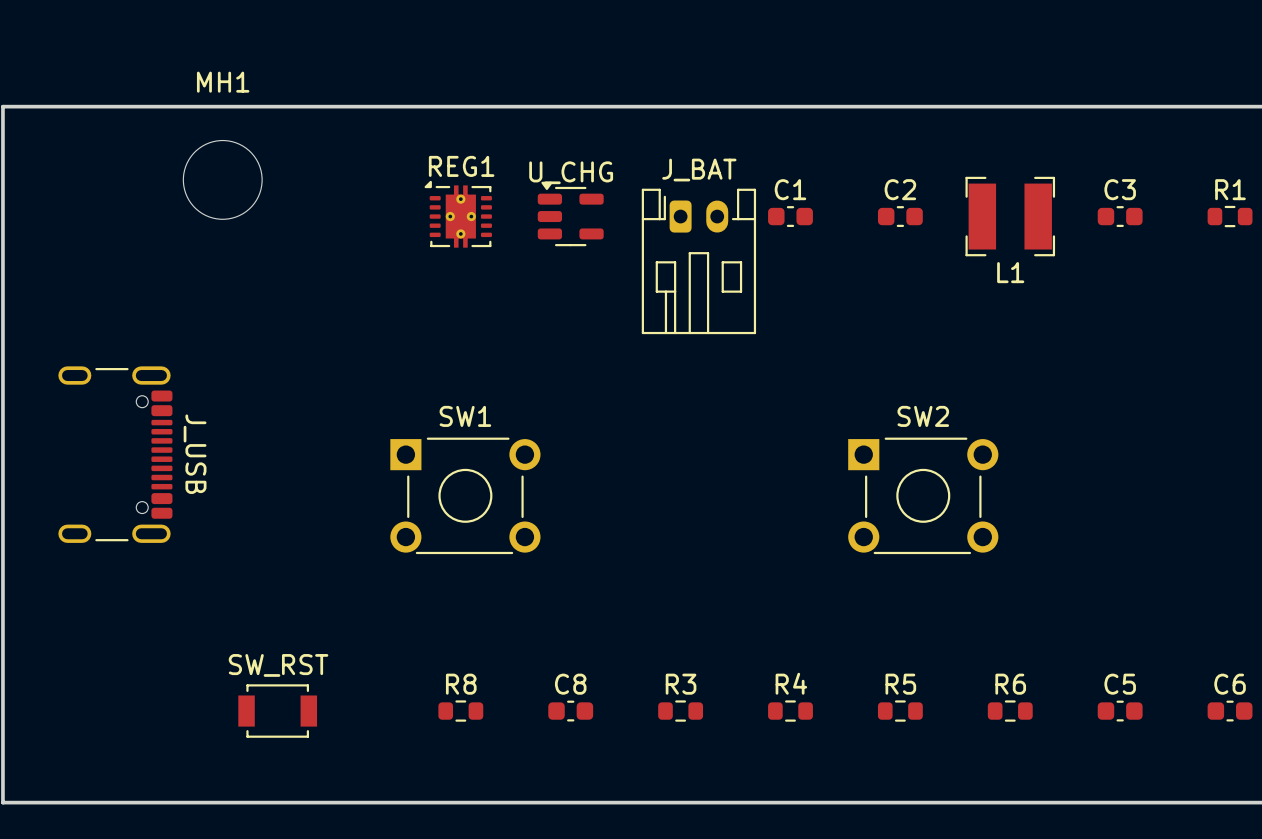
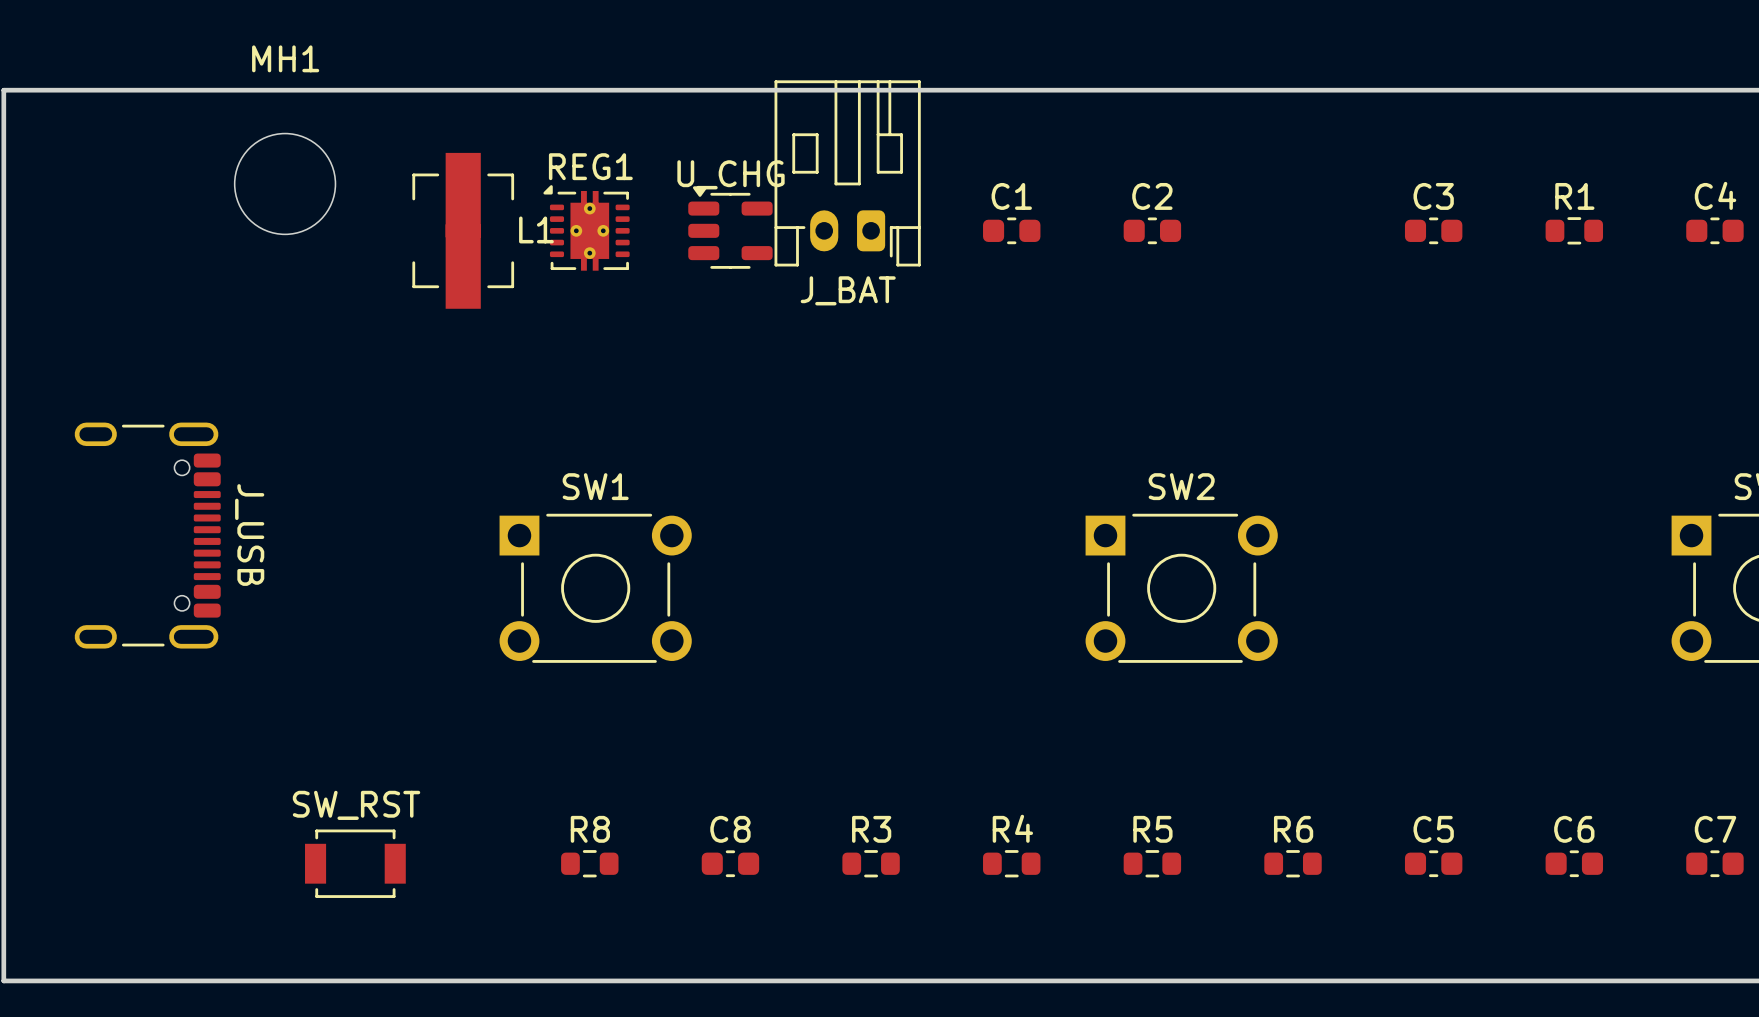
L1 footprint: [965, 176, 1056, 257] -> [412, 152, 515, 309]
J_BAT rotation: 0° (698, 261) -> 180° (847, 173)
J_BAT position: (698, 261) -> (847, 173)
L1 name position: L1 (1010, 272) -> L1 (536, 229)

